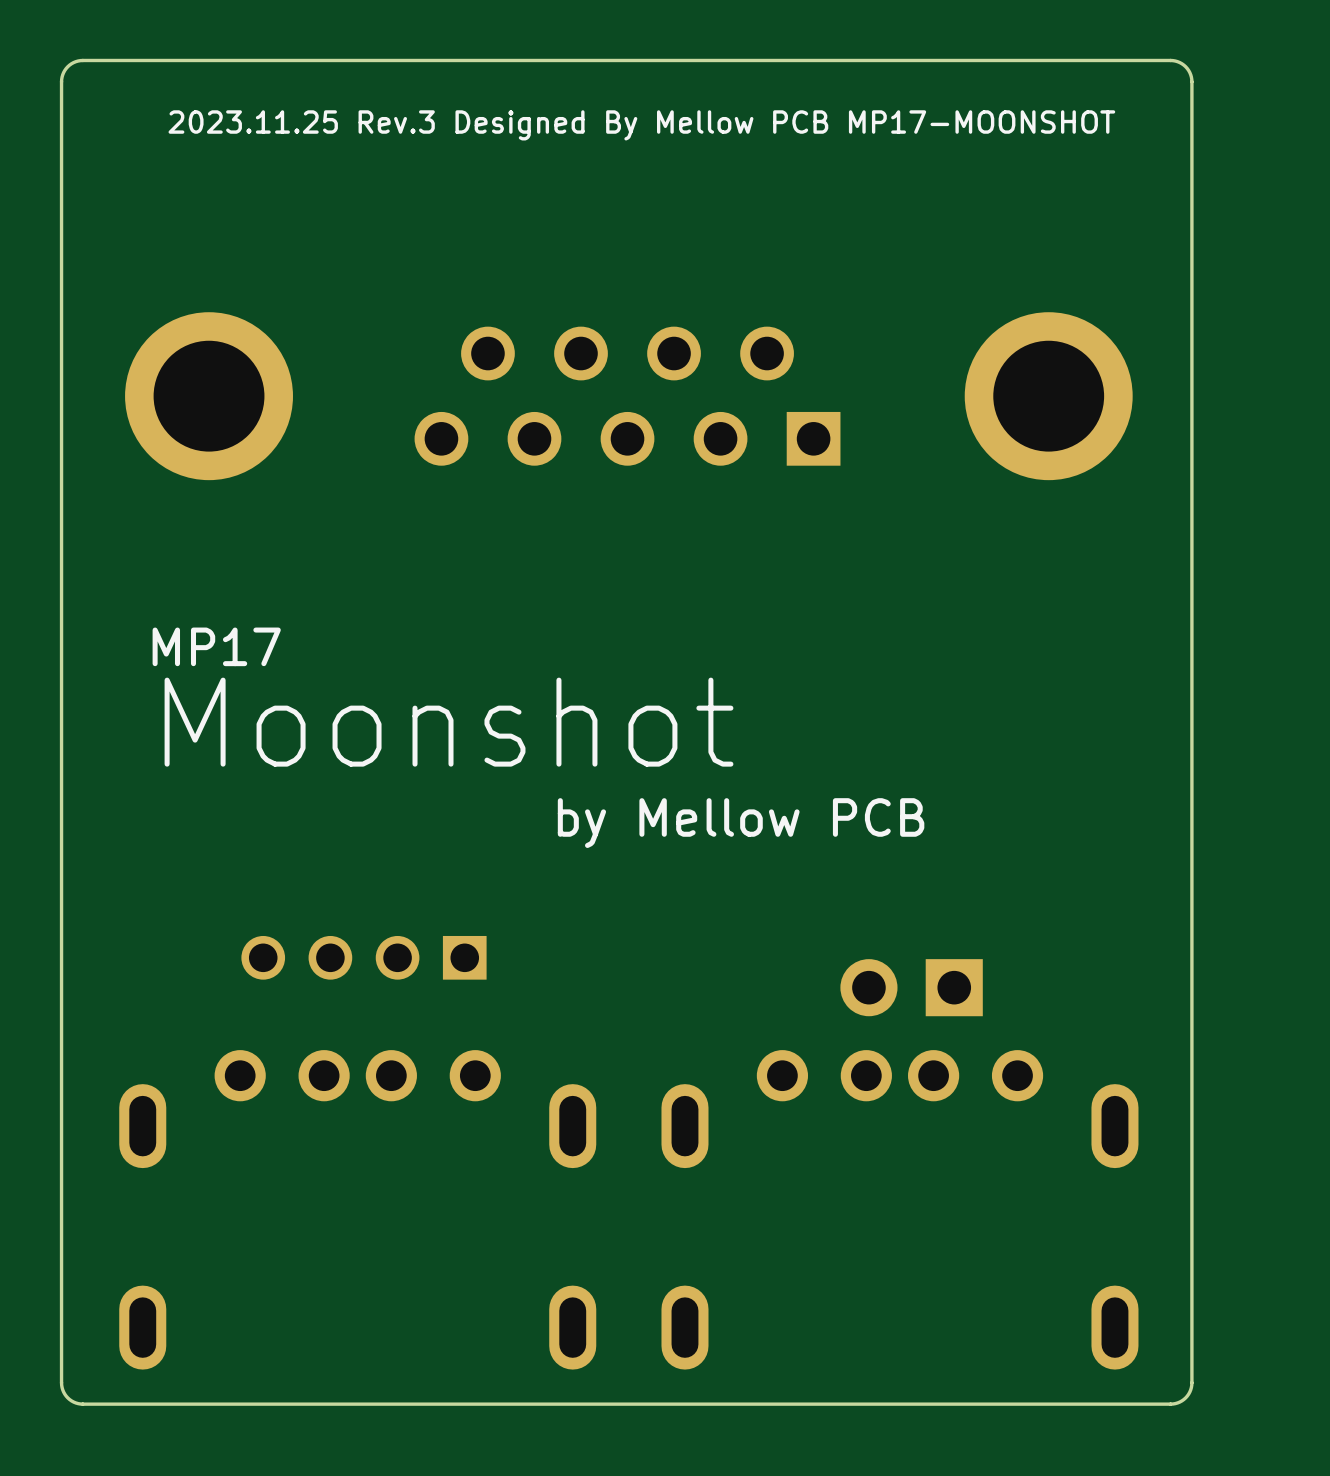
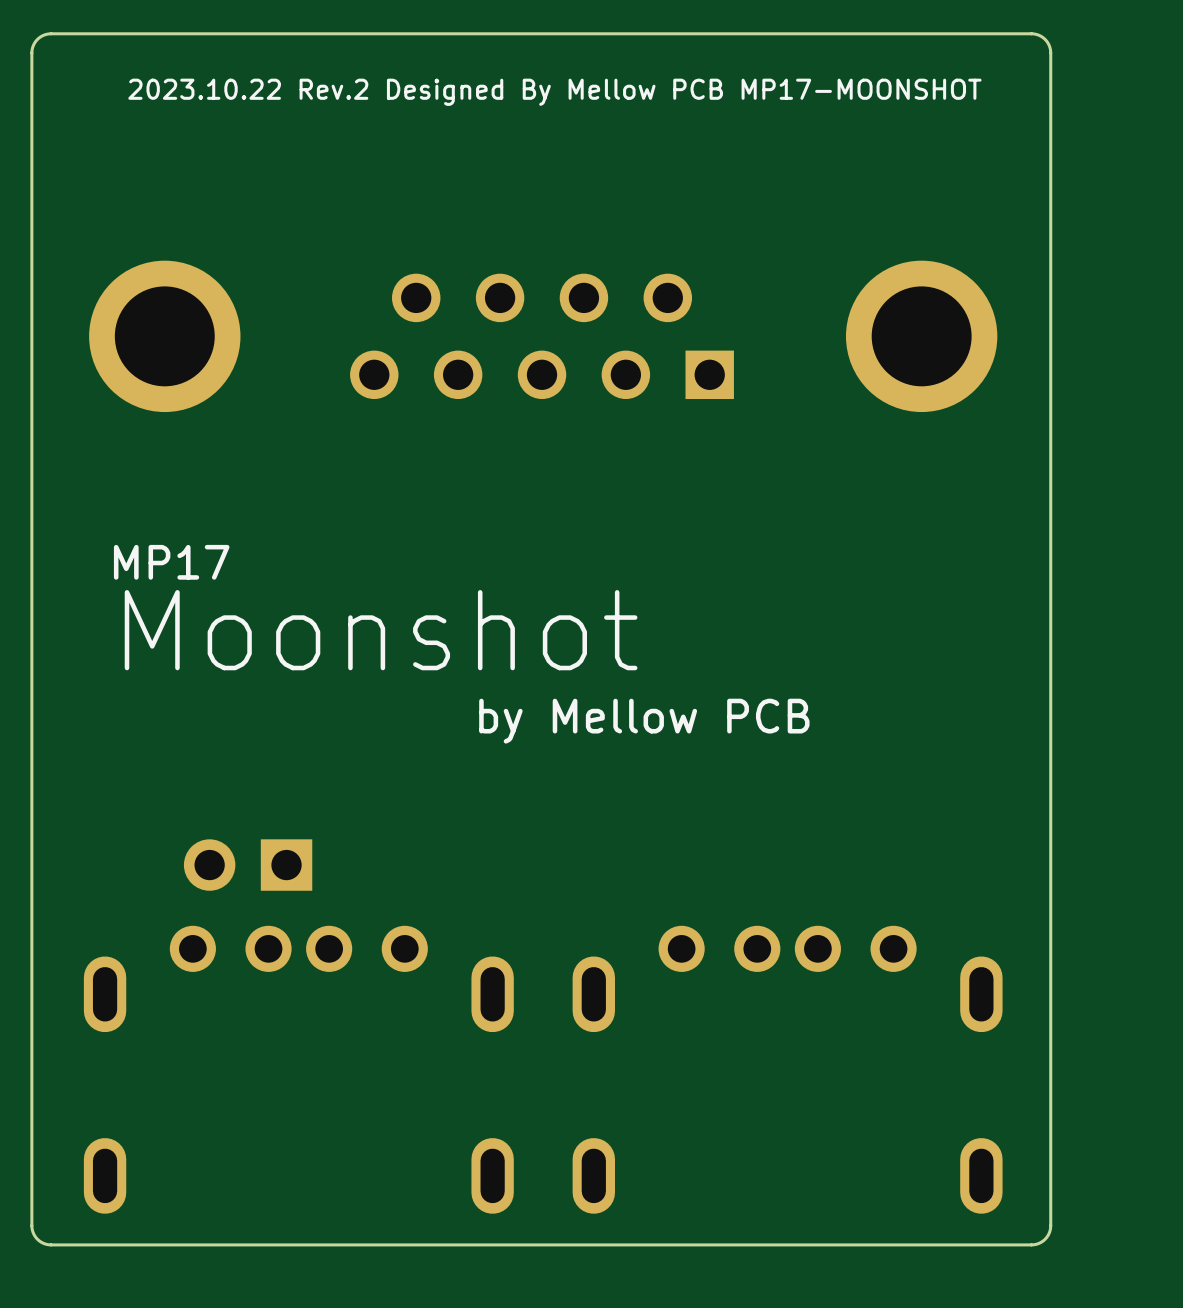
text: 2023.11.25 Rev.3 Designed By Mellow PCB MP17-MOONSHOT (641, 125) -> 2023.10.22 Rev.2 Designed By Mellow PCB MP17-MOONSHOT (554, 92)
part: (363, 957) -> none
part position: (911, 987) -> (248, 865)

